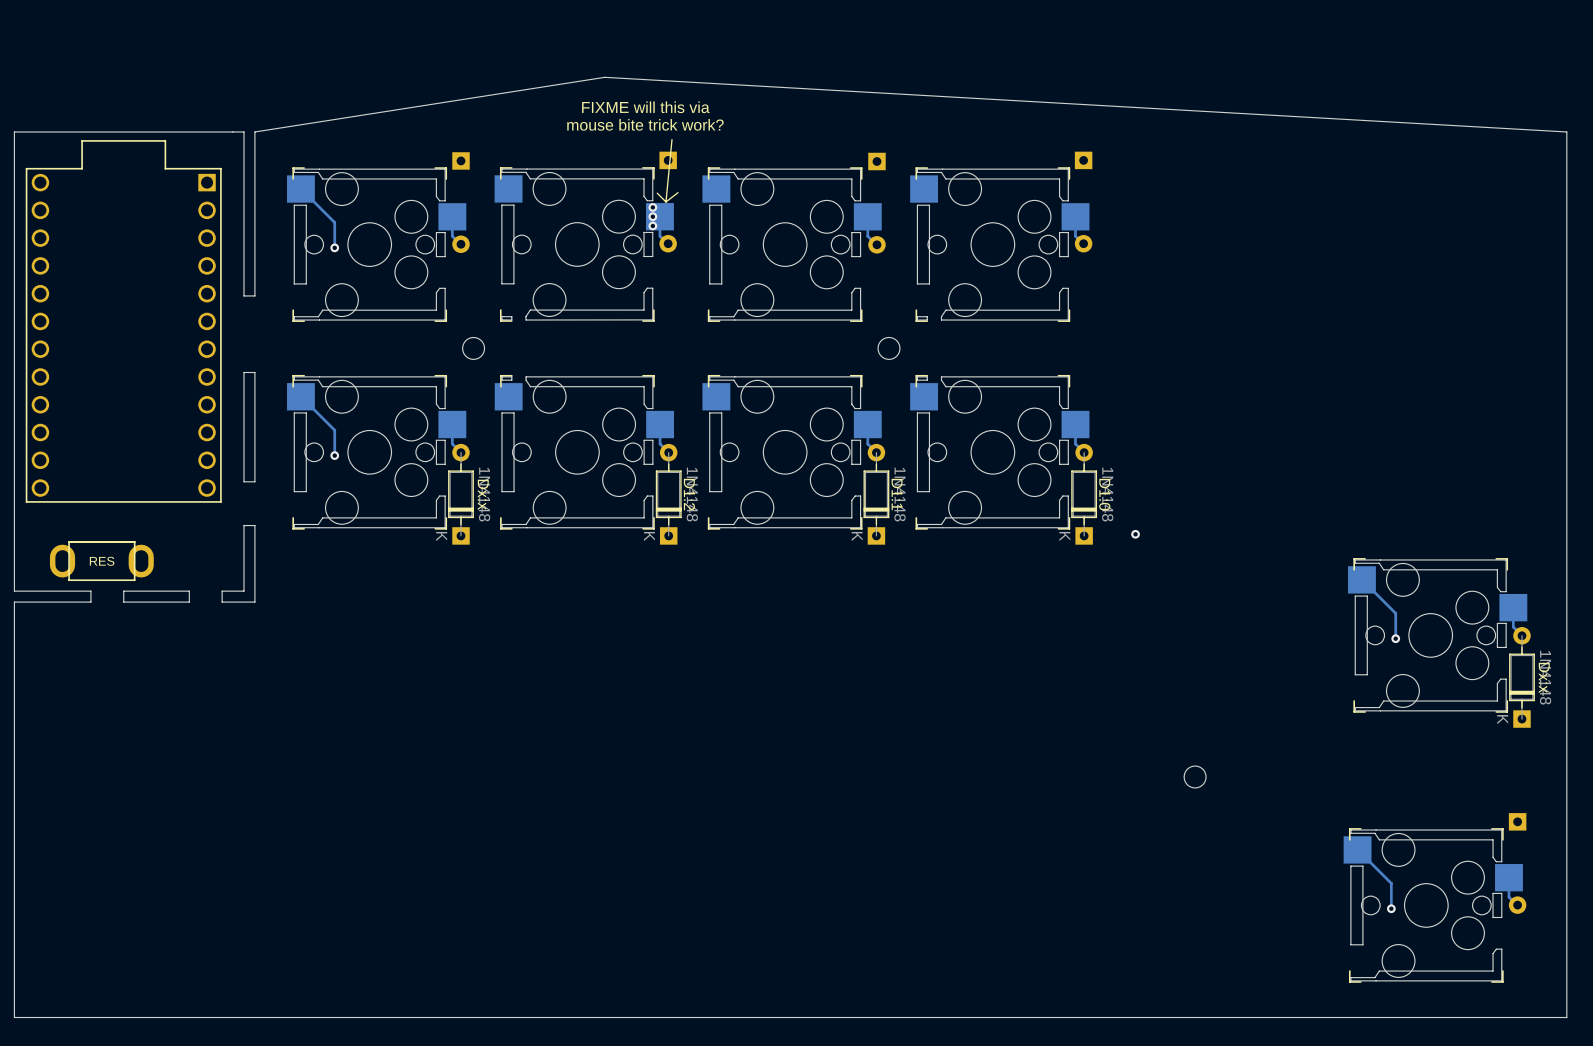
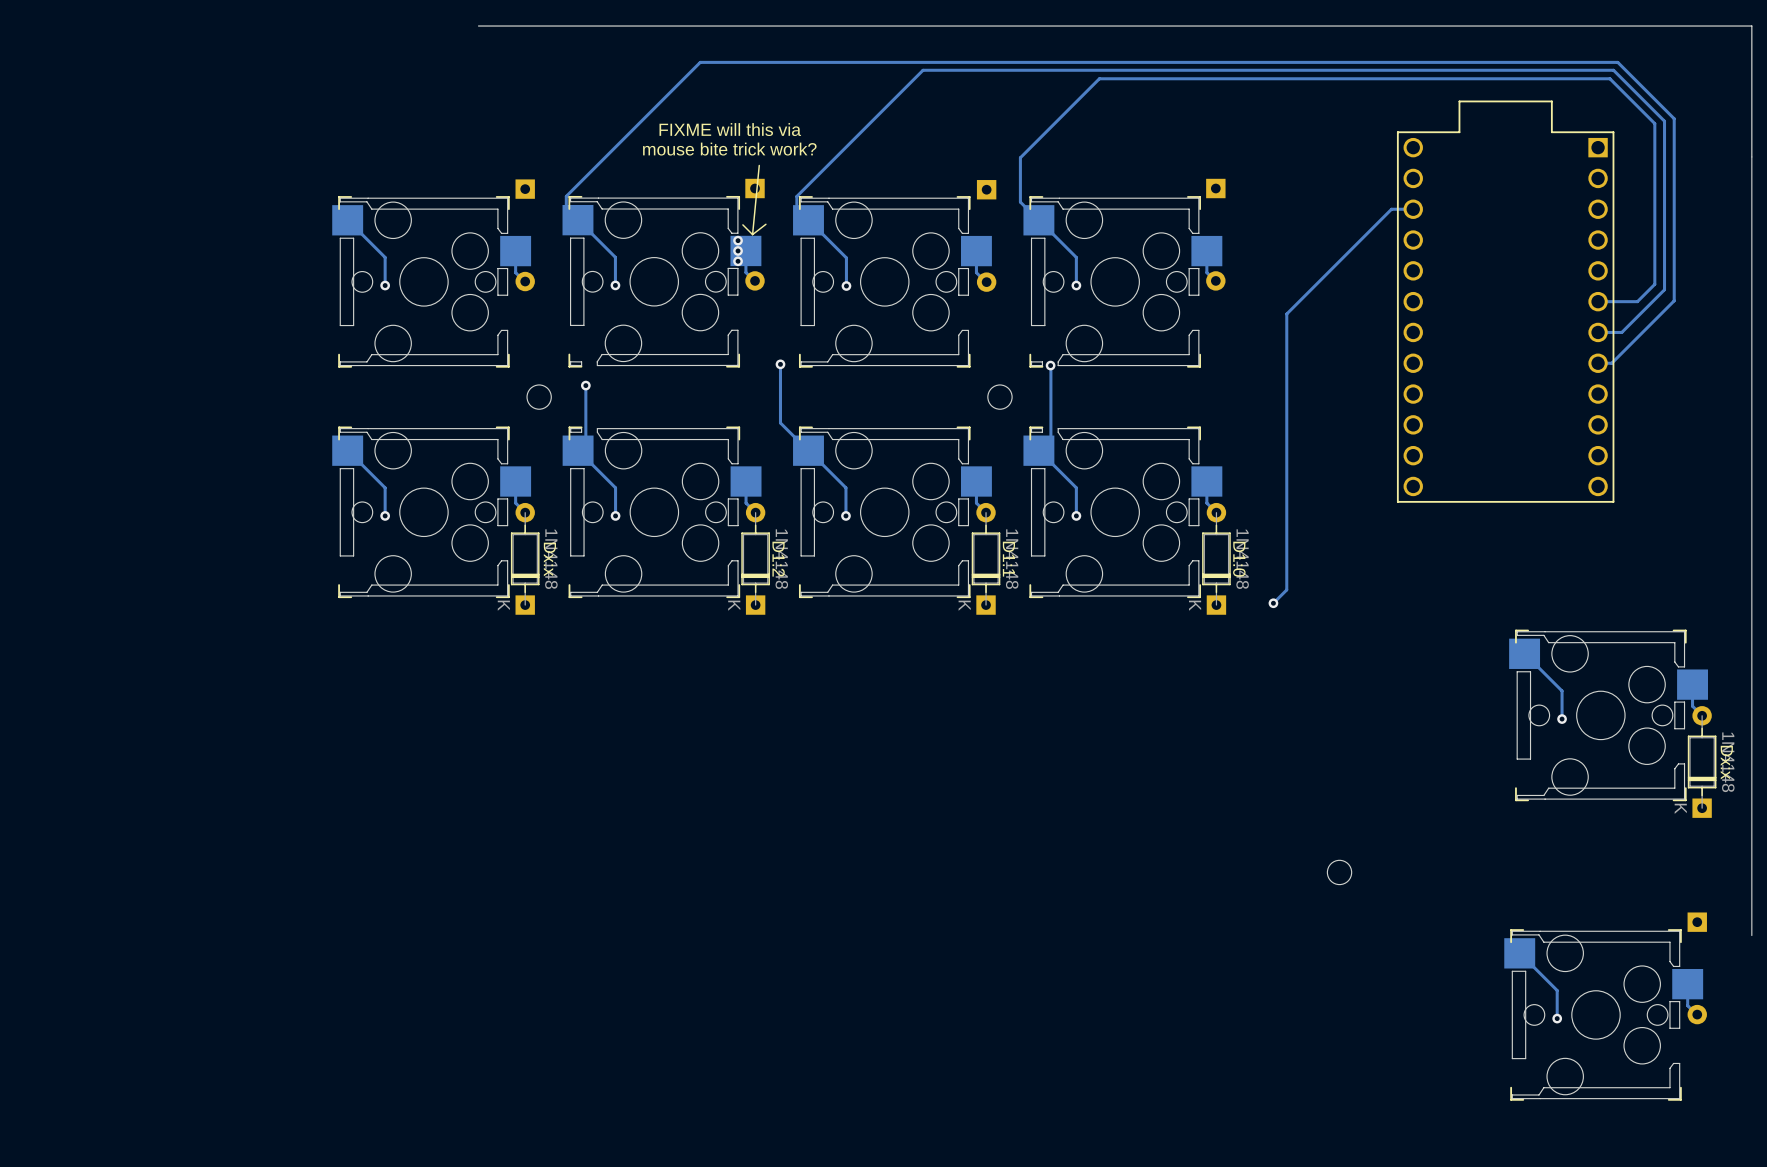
board edge: (1566, 131) (604, 77) (254, 131) (254, 295) (243, 295) (243, 131) (14, 131) (14, 591) (90, 591) (90, 602) (14, 602) (14, 1017) (1566, 1017) (1566, 833) -> (1751, 156) (1751, 26) (478, 26)
track: none -> (1413, 209) (1391, 209) (1286, 314) (1286, 589) (1273, 603)
track: none -> (808, 220) (796, 208) (796, 196) (923, 70) (1613, 70) (1664, 121) (1664, 289) (1621, 332) (1598, 332)
track: none -> (808, 220) (846, 257) (846, 286)
track: none -> (615, 285) (615, 257) (566, 208) (566, 196) (700, 62) (1617, 62) (1674, 118) (1674, 300) (1611, 363) (1598, 363)
via: none -> (615, 285)
track: none -> (1076, 285) (1076, 257) (1020, 202) (1020, 157) (1099, 78) (1609, 78) (1654, 123) (1654, 284) (1637, 301) (1598, 301)
via: none -> (1076, 285)
via: none -> (846, 286)
part: none -> (1505, 301)
track: none -> (780, 364) (780, 422) (845, 487) (845, 515)
via: none -> (780, 364)
track: none -> (1050, 365) (1050, 438) (1038, 450) (1076, 487) (1076, 515)
via: none -> (1050, 365)
part: (123, 321) -> none
track: none -> (585, 385) (585, 442) (578, 450) (615, 487) (615, 515)
via: none -> (585, 385)
board edge: (254, 372) (243, 372) (243, 481) (254, 481) (254, 372) -> none
via: none -> (615, 515)
via: none -> (845, 515)
via: none -> (1076, 515)
board edge: (254, 525) (254, 602) (222, 602) (222, 591) (243, 591) (243, 525) (254, 525) -> none
part: (101, 561) -> none
board edge: (189, 591) (123, 591) (123, 602) (189, 602) (189, 591) -> none

